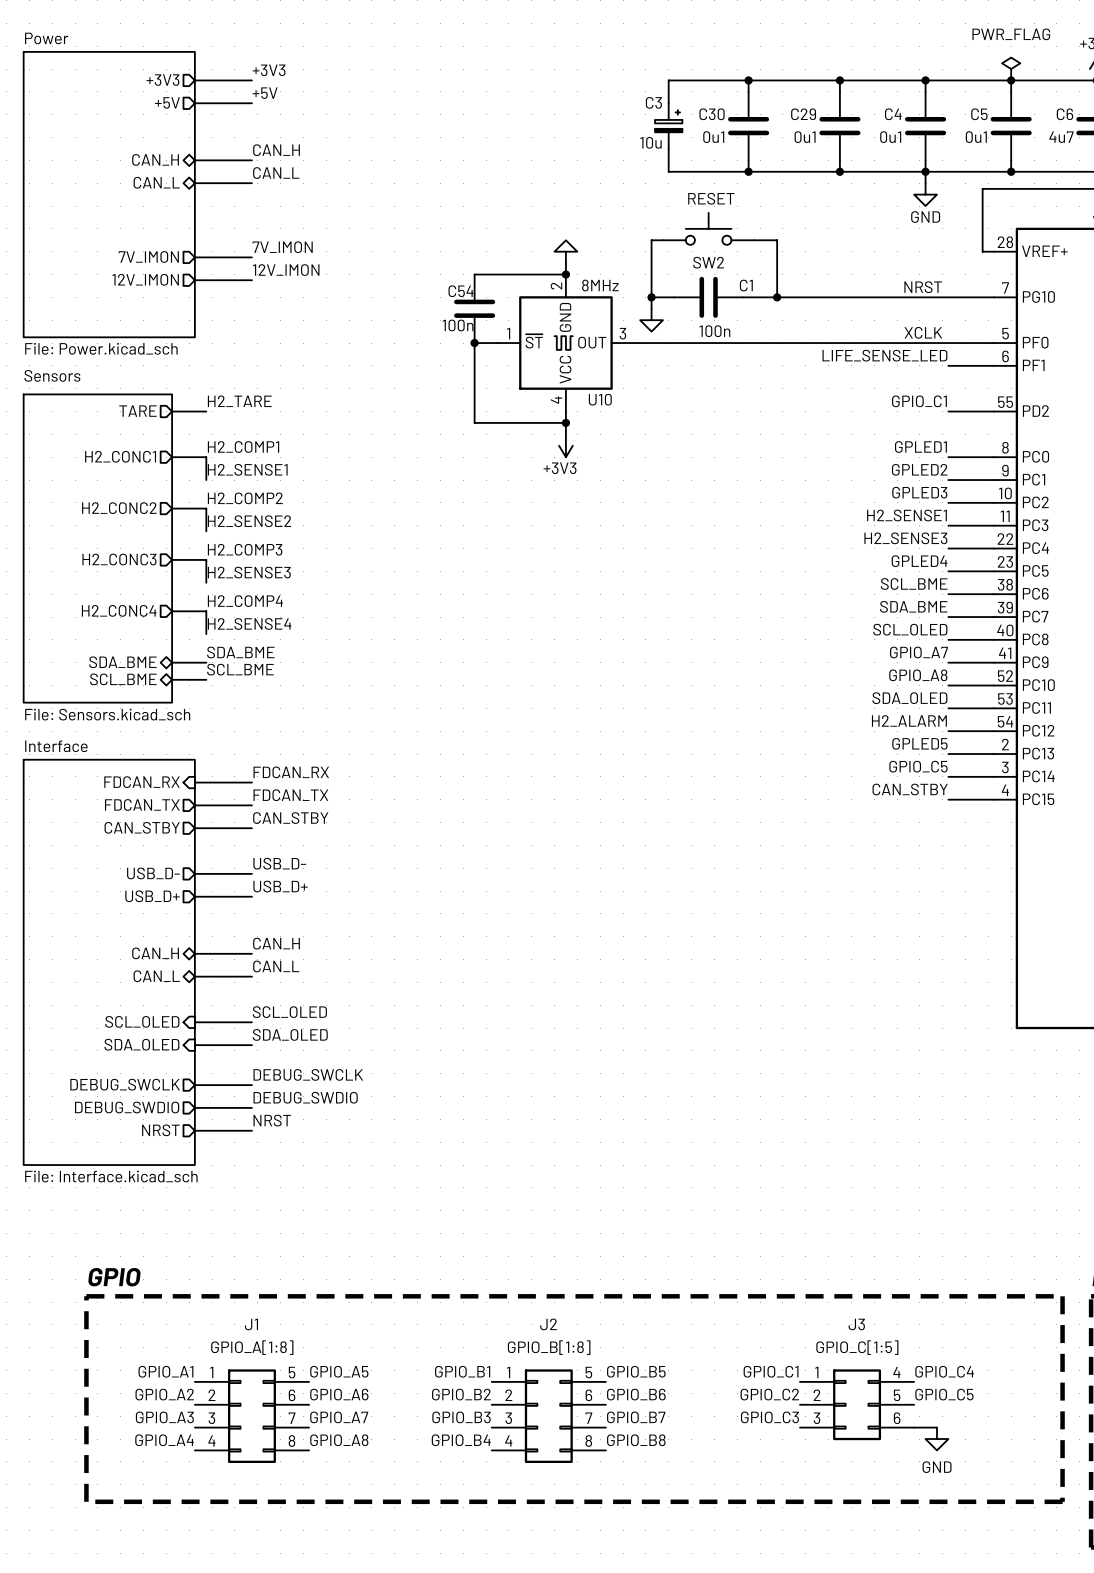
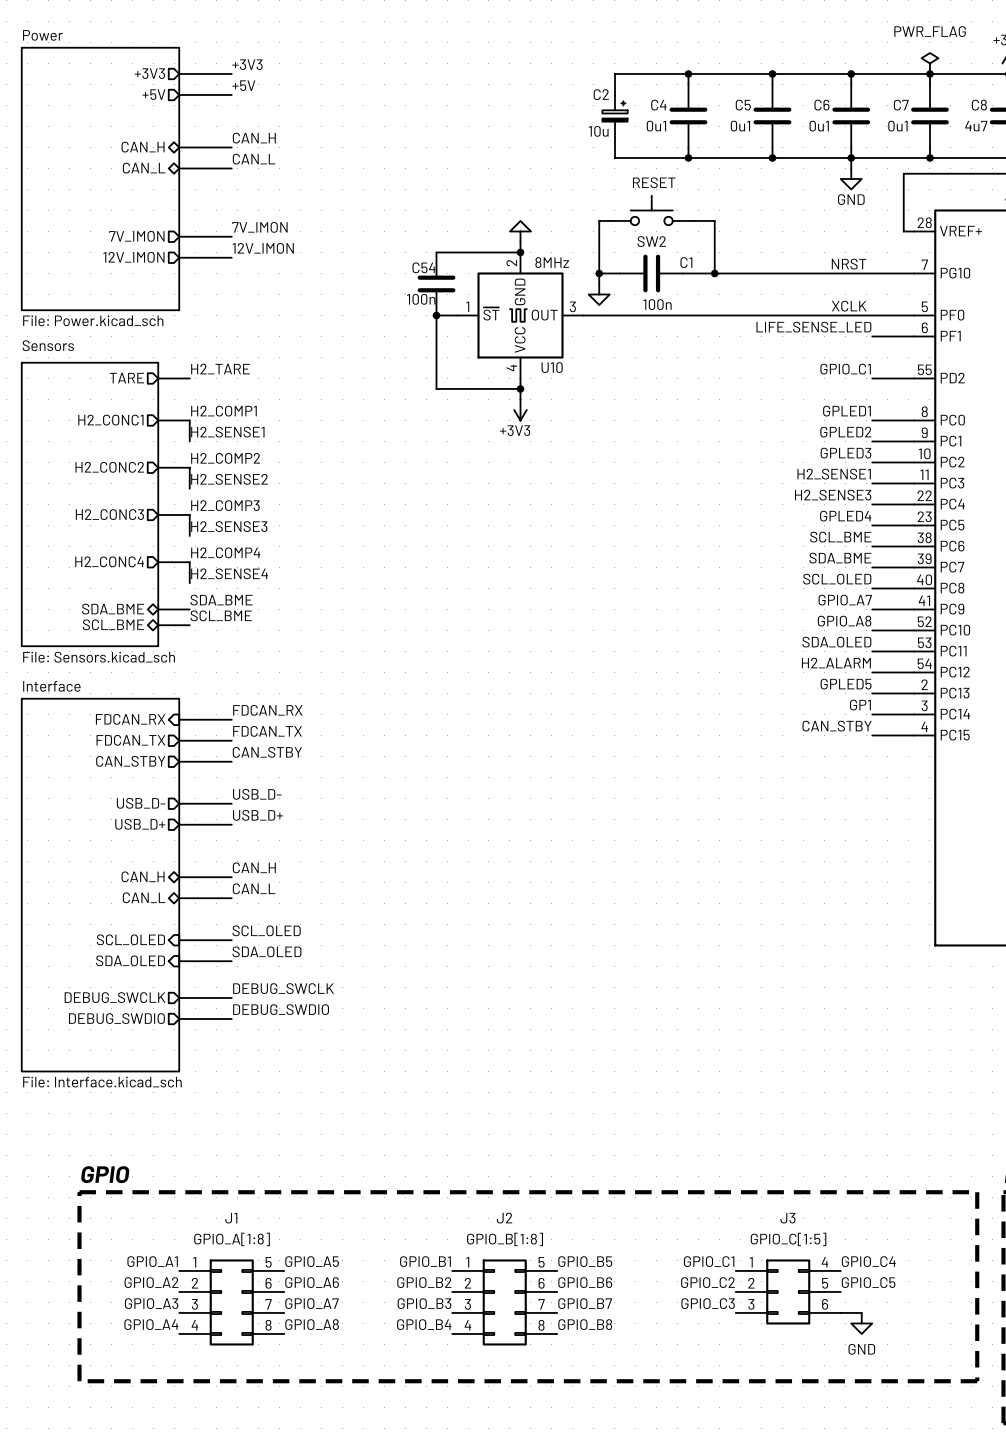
C3 name: C3 (653, 102) -> C2 (601, 94)
C30 name: C30 (712, 114) -> C4 (658, 105)
C29 name: C29 (803, 114) -> C5 (743, 105)
C4 name: C4 (893, 114) -> C6 (821, 105)
C5 name: C5 (979, 114) -> C7 (901, 105)
C6 name: C6 (1065, 114) -> C8 (979, 105)
label: GPIO_C5 (918, 766) -> GP1 (860, 705)
label: NRST (272, 1120) -> none
sheet pin: NRST (160, 1130) -> none
wire: (194, 1130) (251, 1130) -> none

